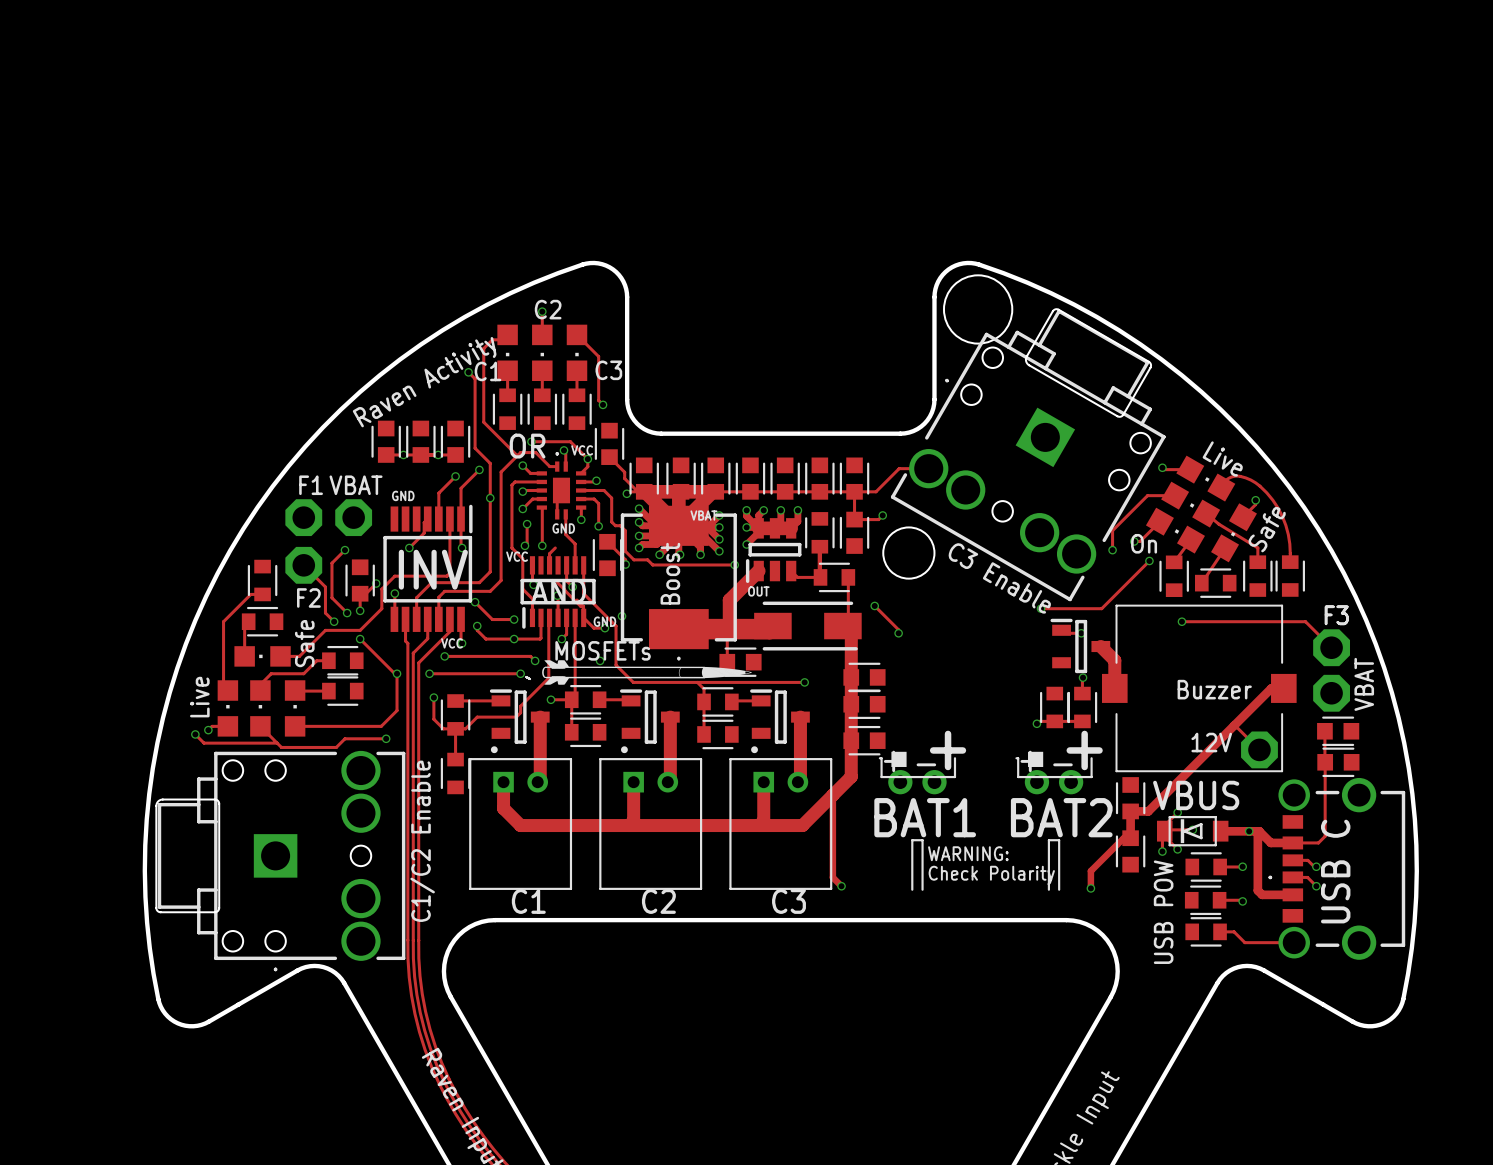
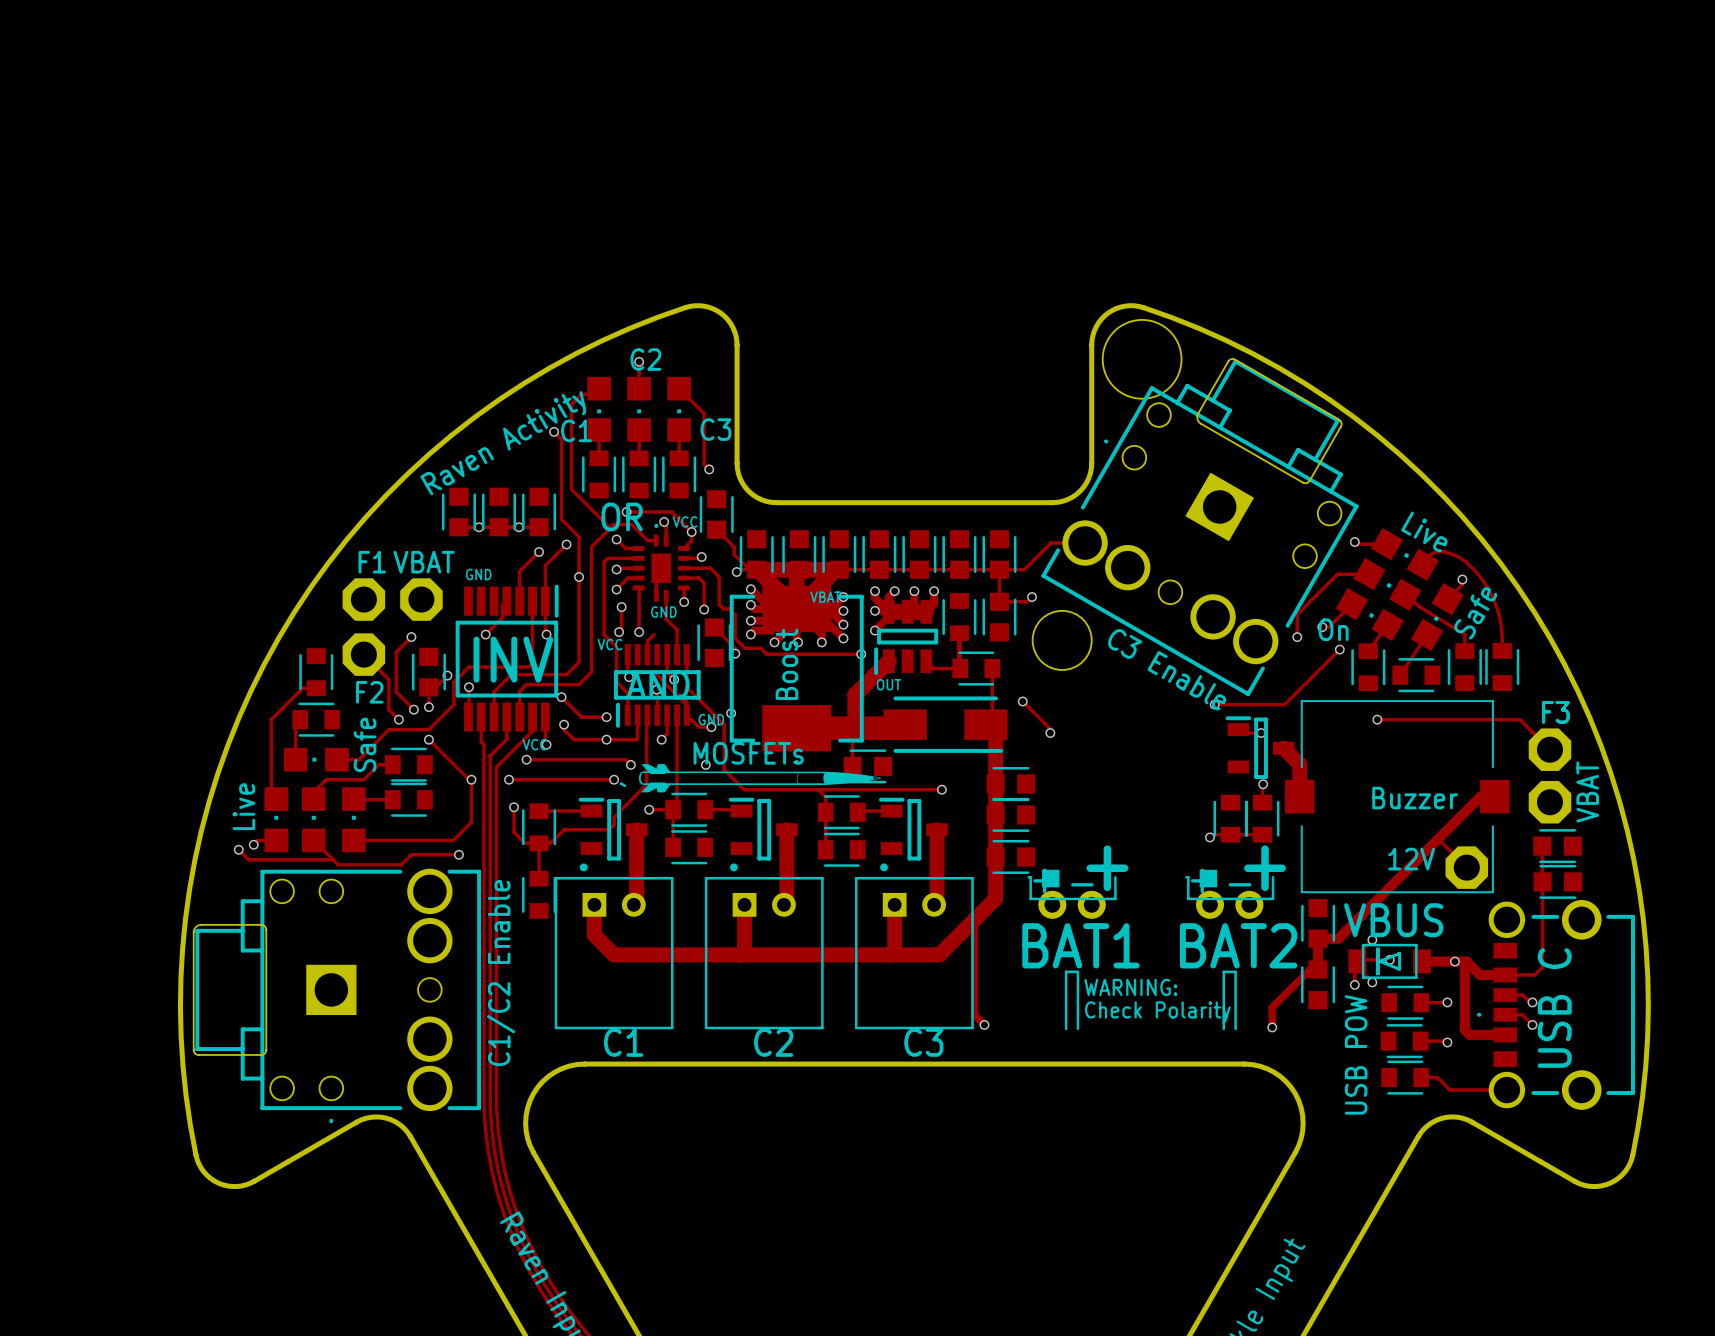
text position: MOSFETs (603, 650) -> MOSFETs (748, 753)

